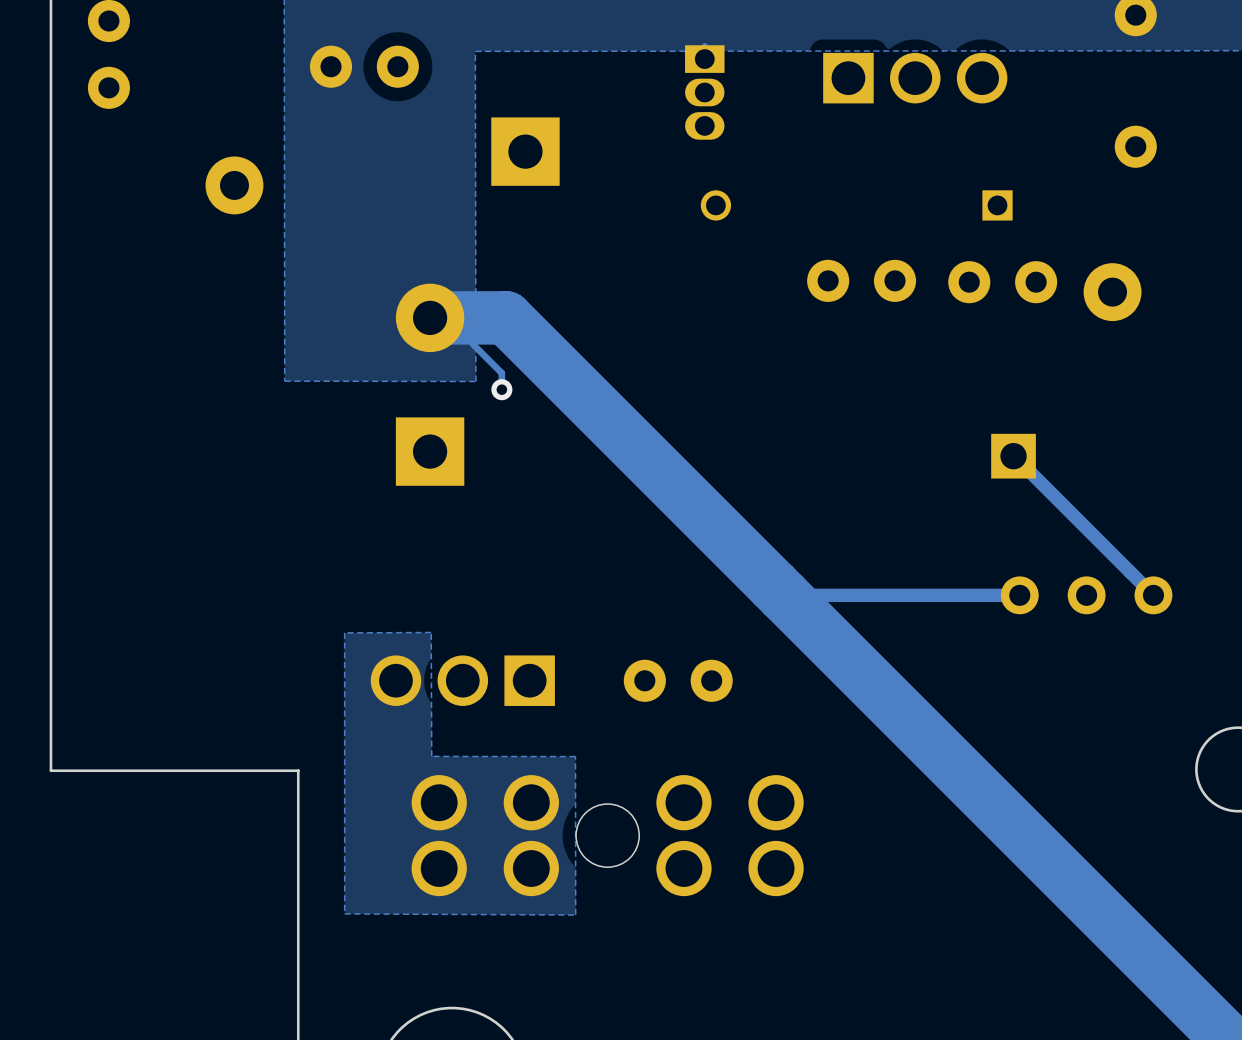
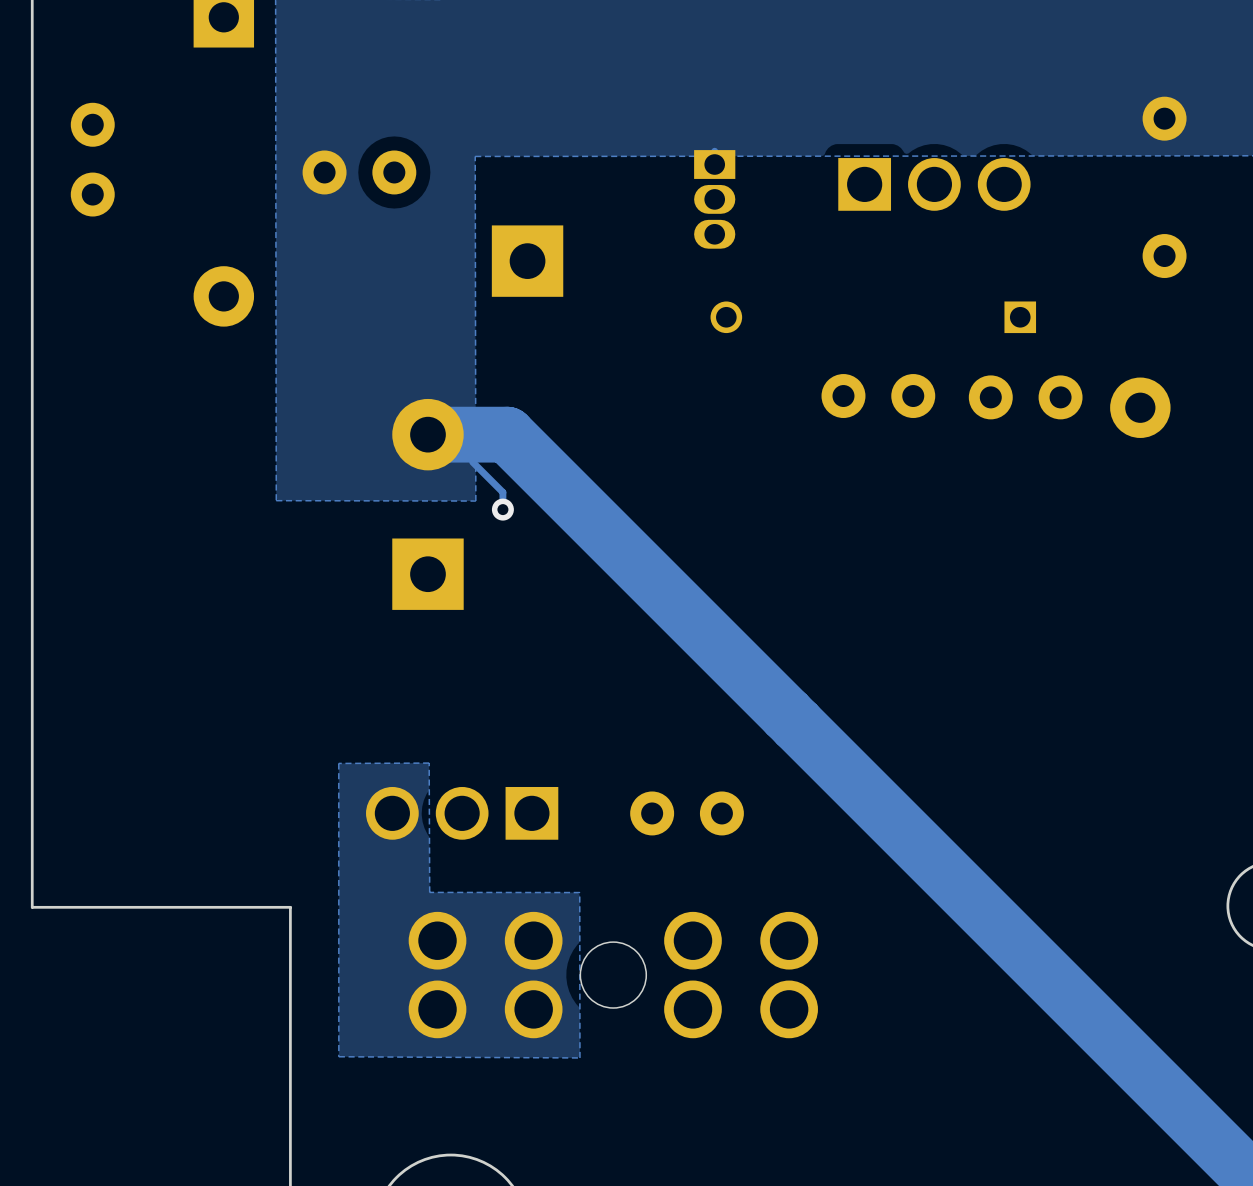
track: (1013, 456) (1153, 595) (1130, 572) -> none
part: (1013, 456) -> none
track: (1019, 595) (783, 595) -> none
part: (1086, 595) -> none

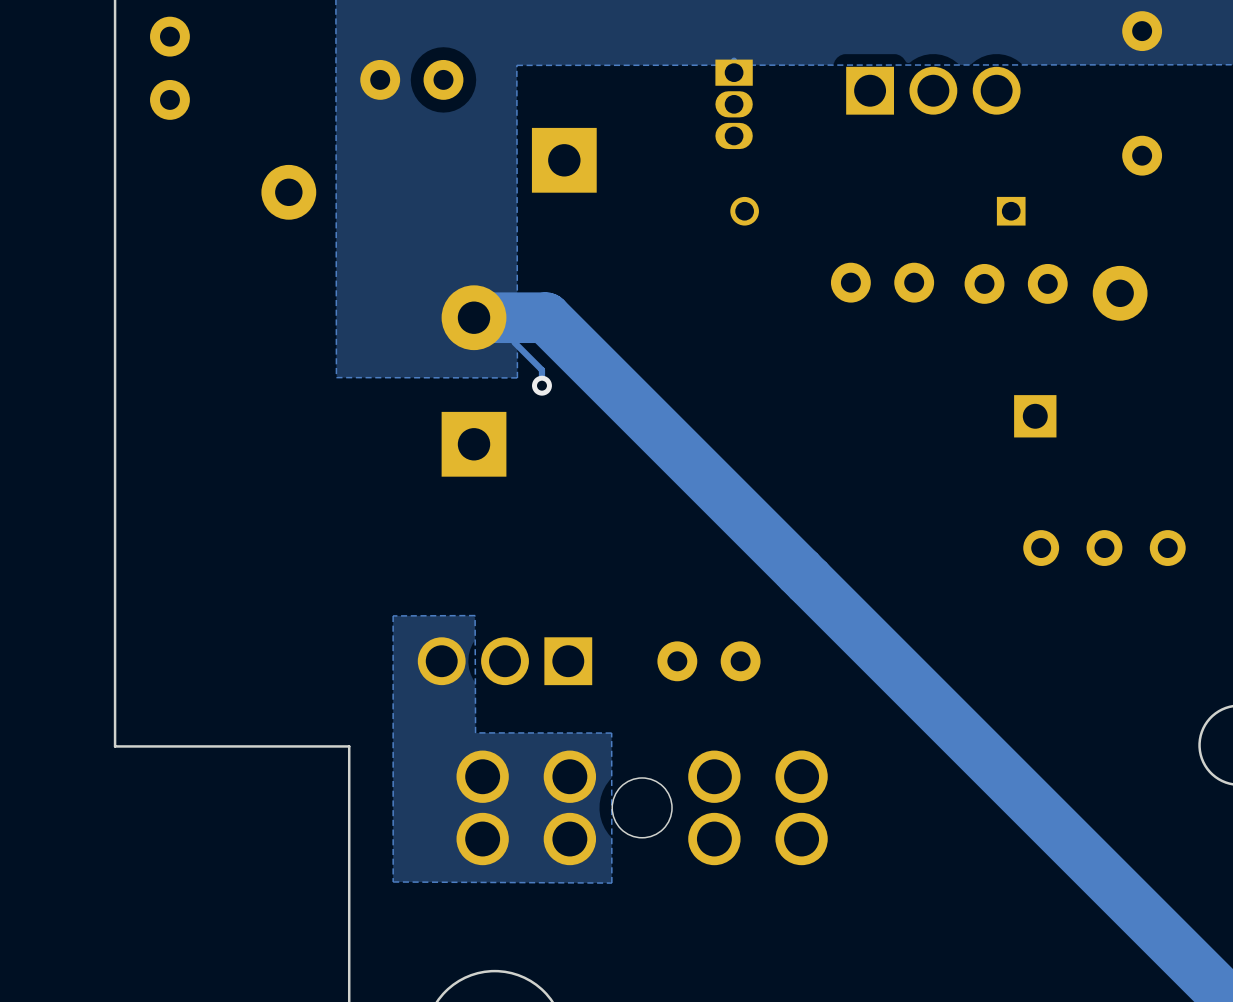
part: none -> (1035, 416)
part: none -> (1104, 548)

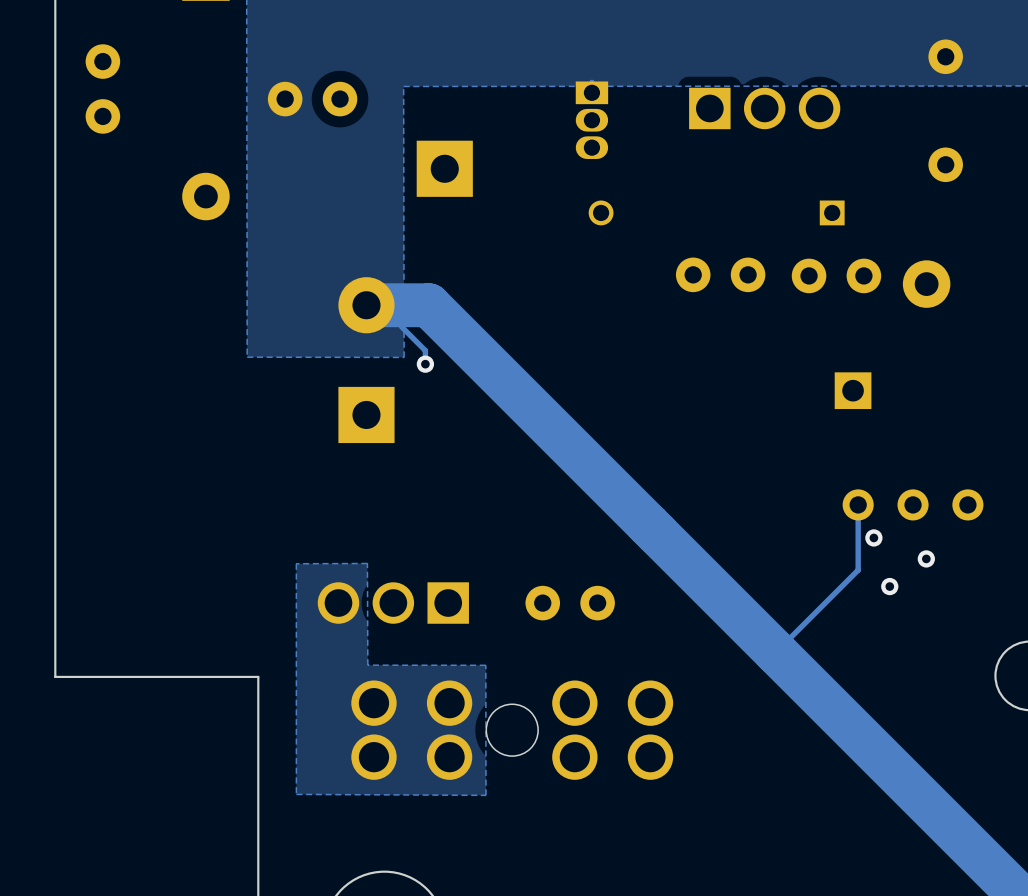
track: none -> (858, 504) (858, 570) (775, 652)
via: none -> (873, 537)
via: none -> (926, 558)
via: none -> (889, 586)

